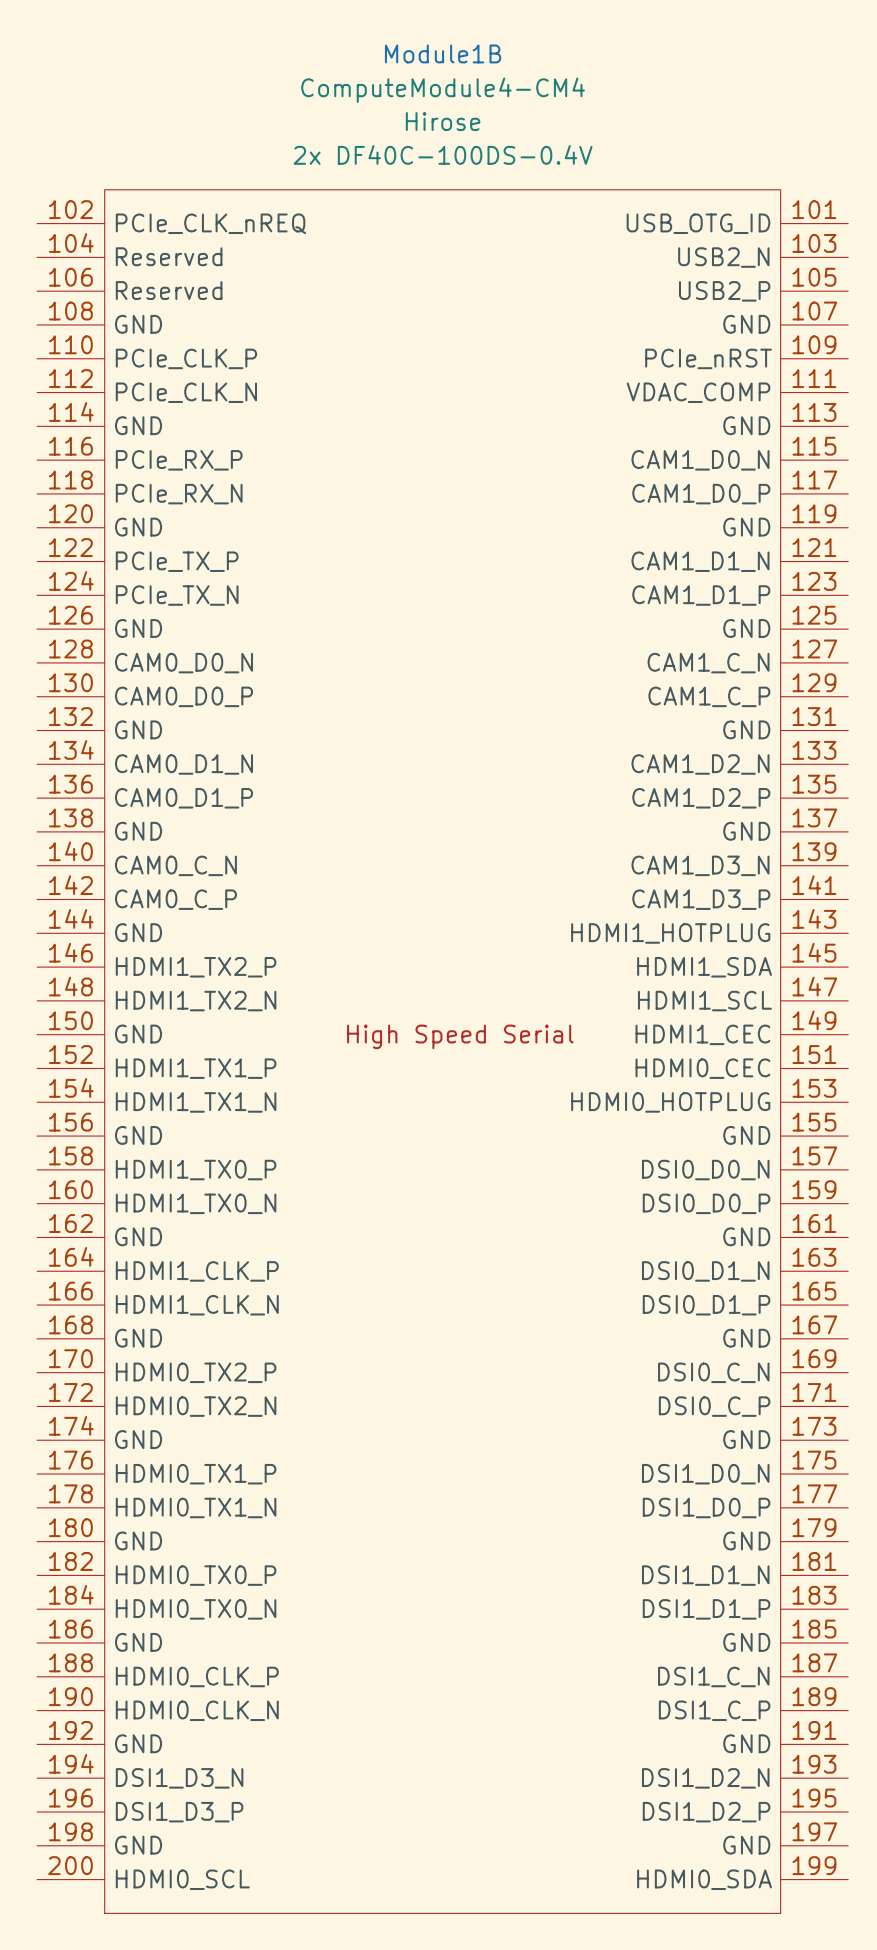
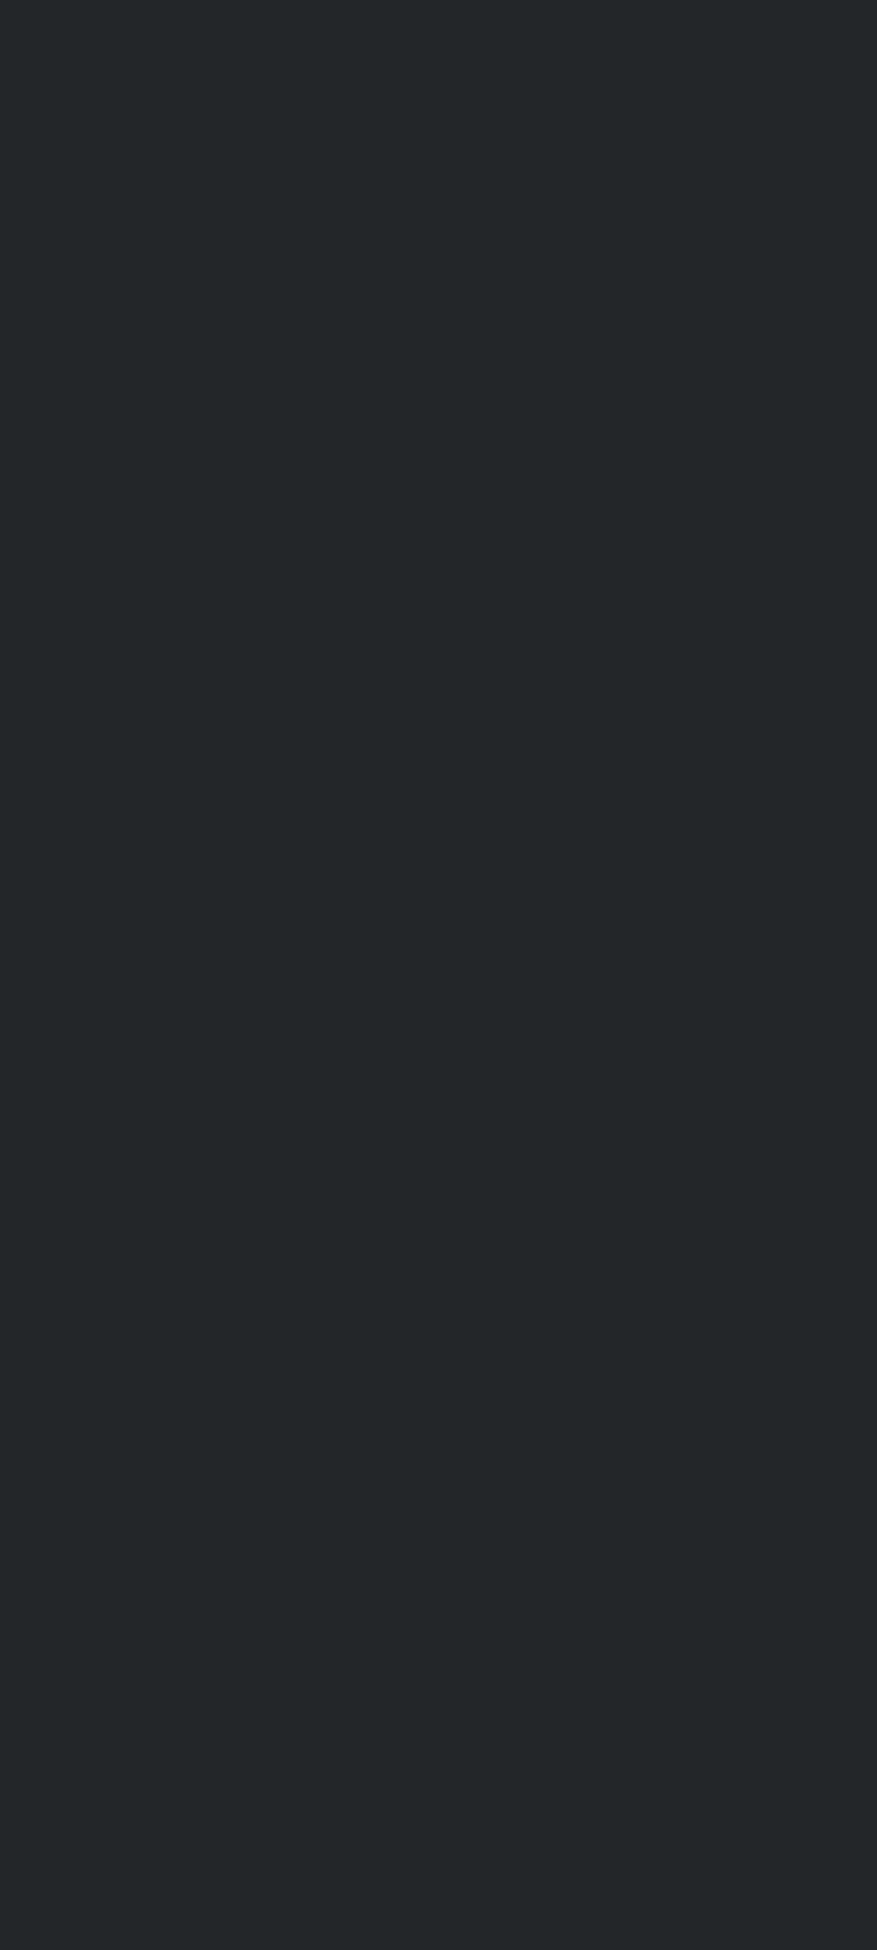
Module1B: ComputeModule4-CM4 (442, 1051) -> none

